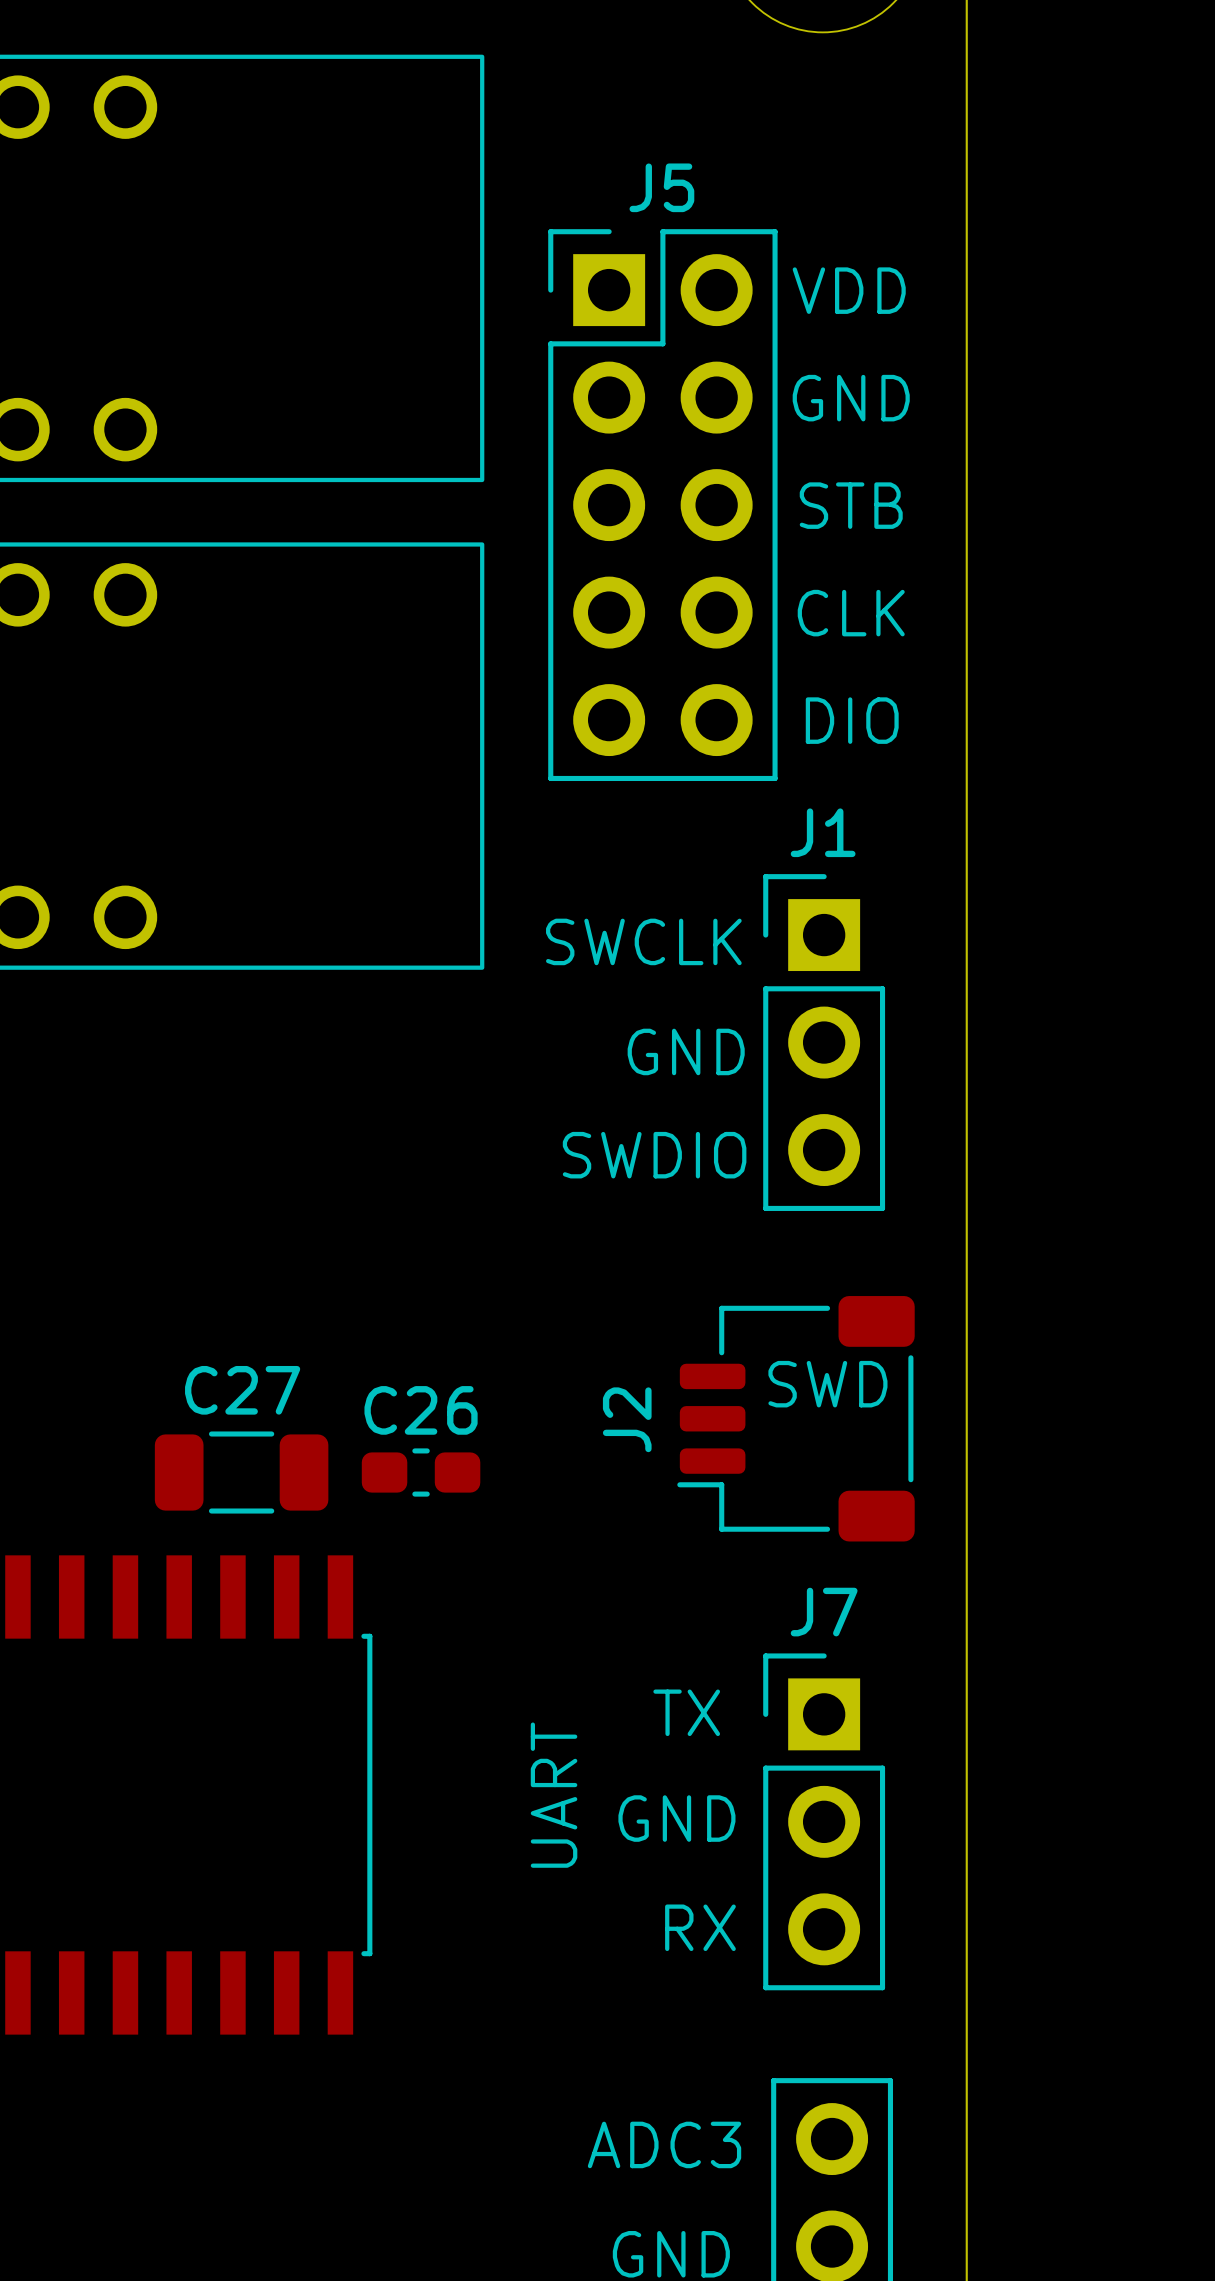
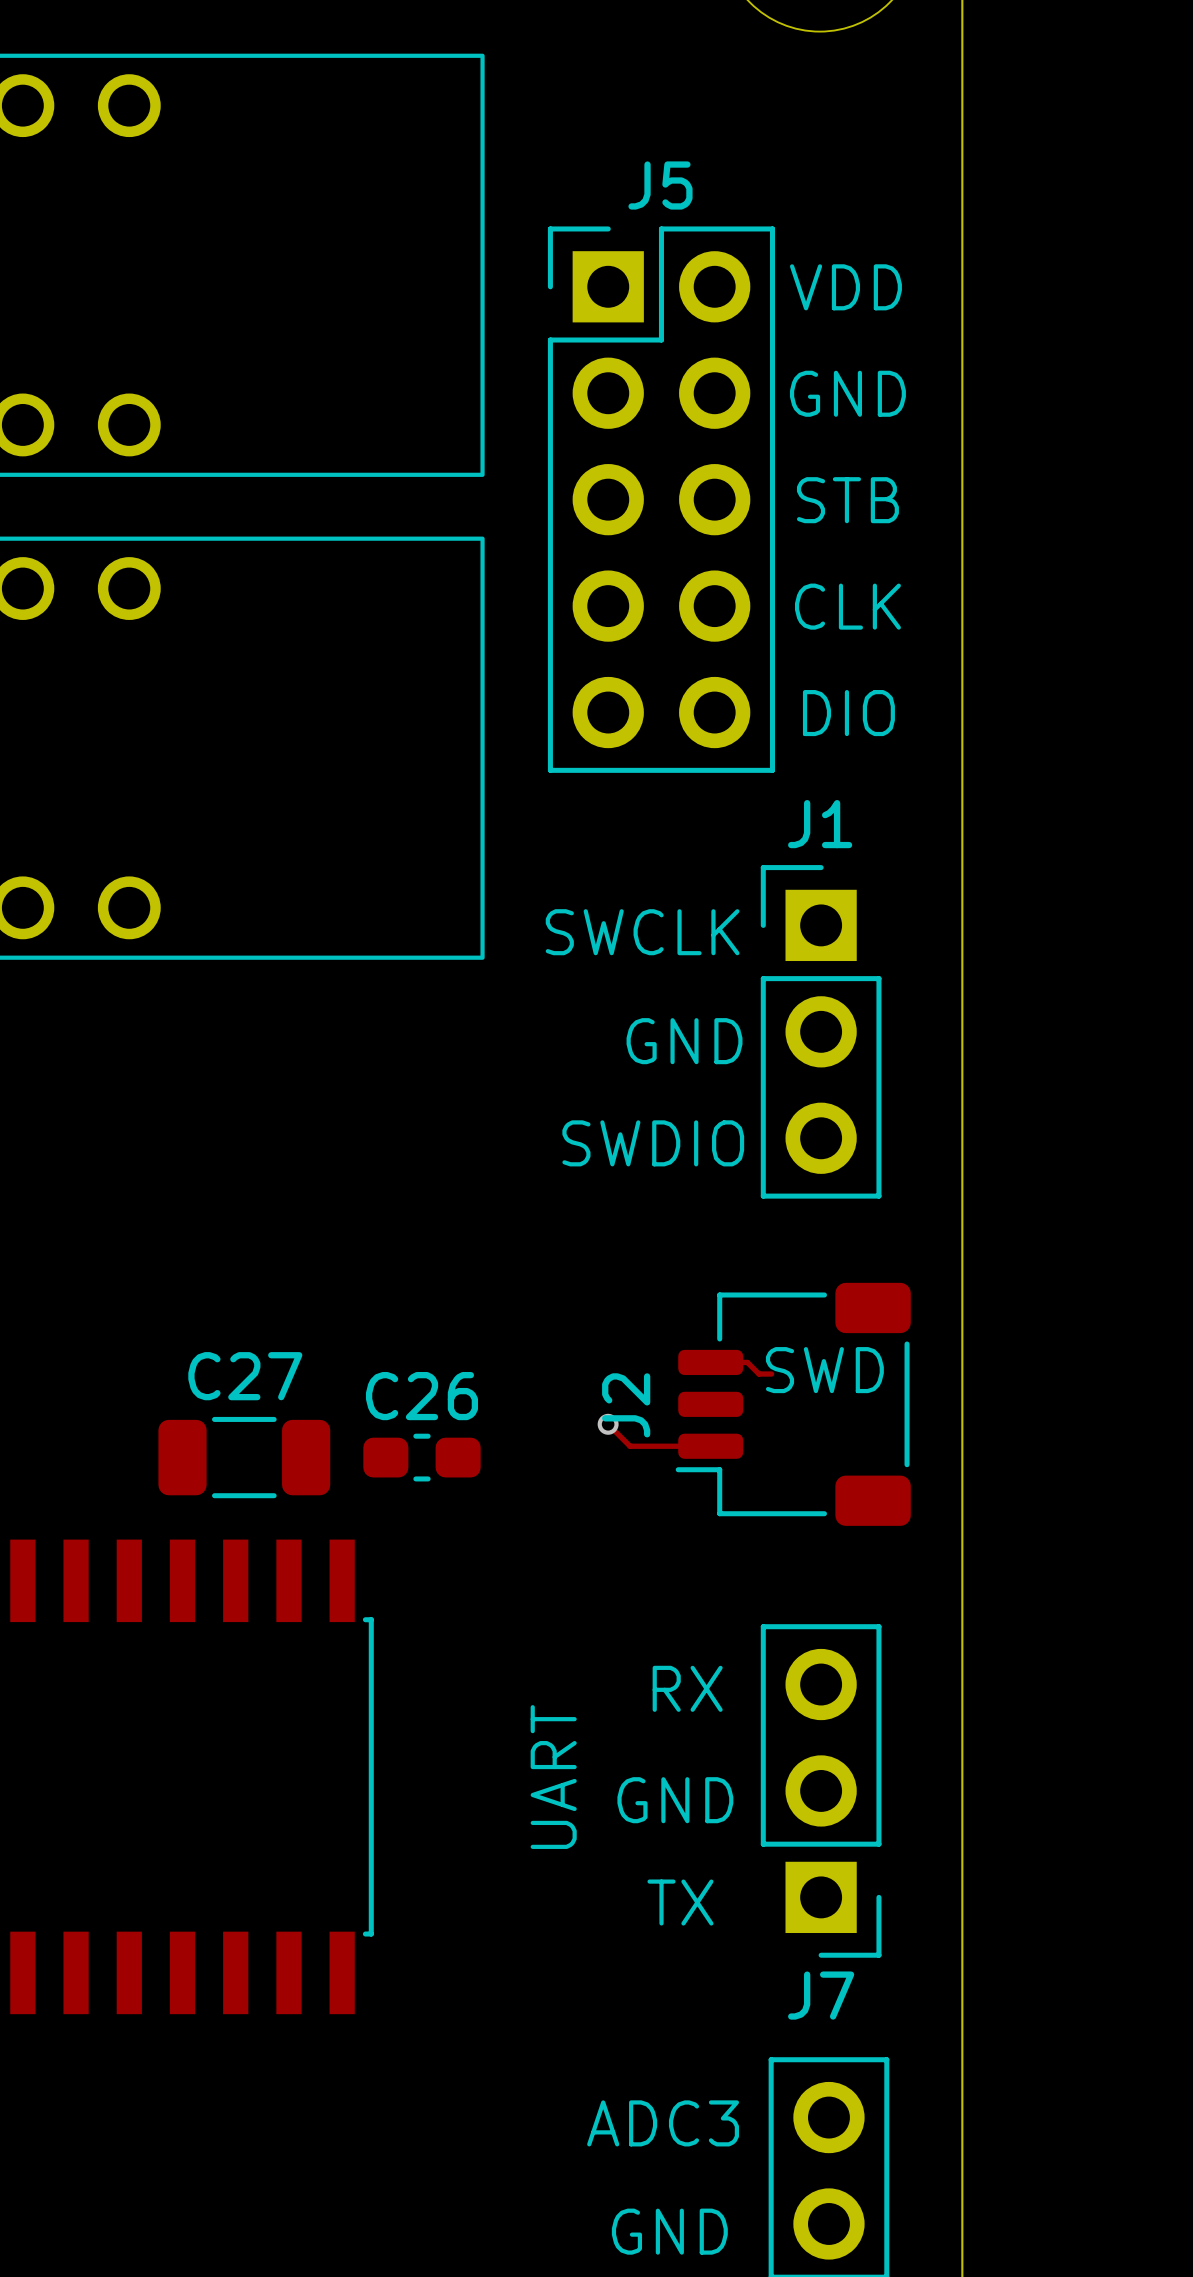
track: none -> (710, 1362) (747, 1362) (758, 1374) (771, 1374)
track: none -> (608, 1424) (630, 1446) (710, 1446)
via: none -> (608, 1424)
text: TX (686, 1712) -> RX (687, 1688)
J7 rotation: 0° (824, 1821) -> 180° (821, 1790)
text: RX (700, 1927) -> TX (680, 1902)

